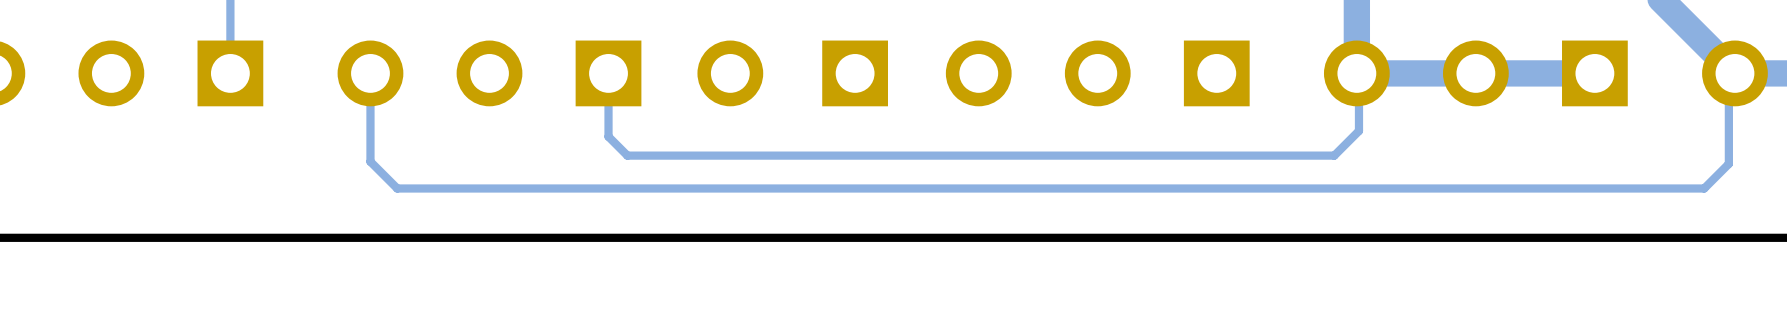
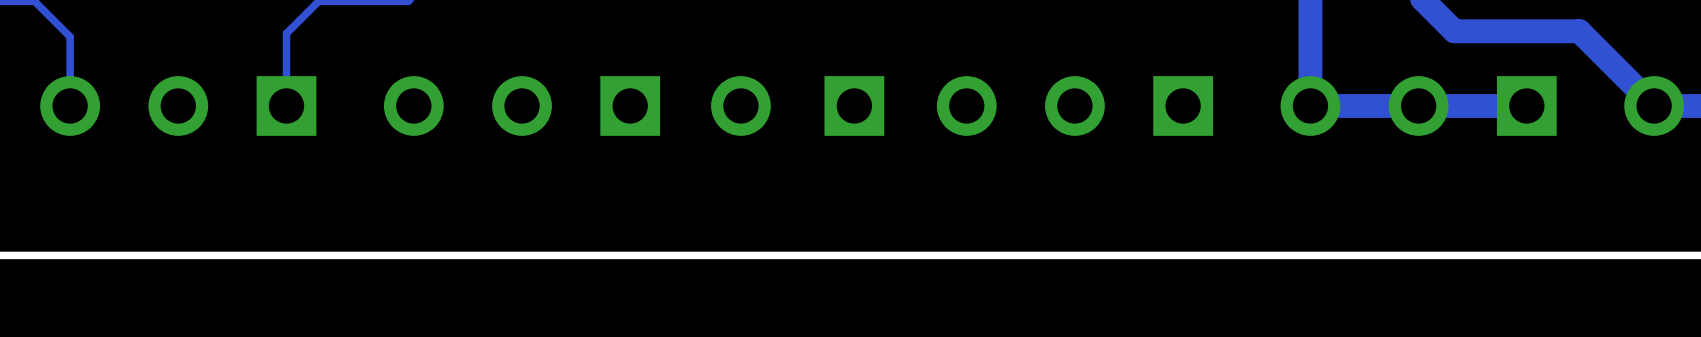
track: (1356, 73) (1358, 75) (1358, 130) (1334, 155) (627, 155) (608, 136) (608, 73) -> none
track: (1734, 73) (1728, 79) (1728, 163) (1704, 188) (397, 188) (370, 161) (370, 73) -> none

